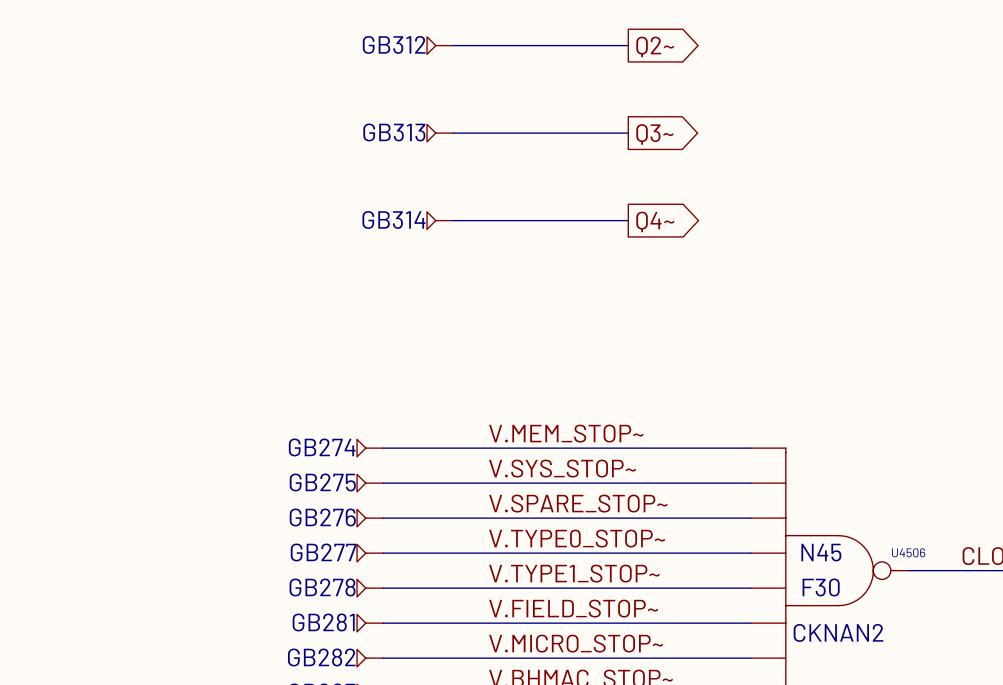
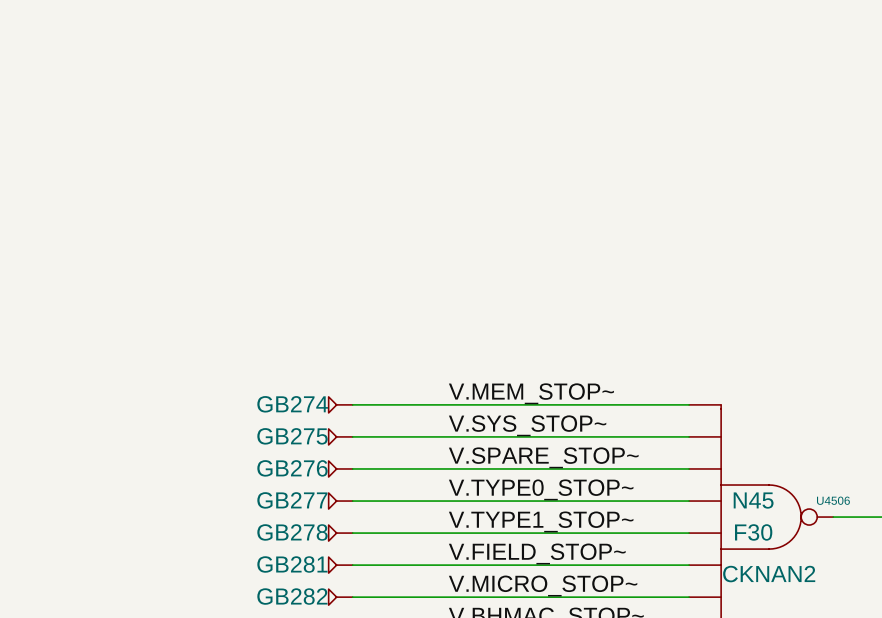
GB312: (439, 45) -> none
wire: (453, 45) (628, 45) -> none
global label: Q2~ (655, 46) -> none
GB313: (439, 133) -> none
wire: (453, 133) (628, 133) -> none
global label: Q3~ (655, 134) -> none
GB314: (439, 220) -> none
wire: (453, 220) (628, 220) -> none
global label: Q4~ (655, 221) -> none

